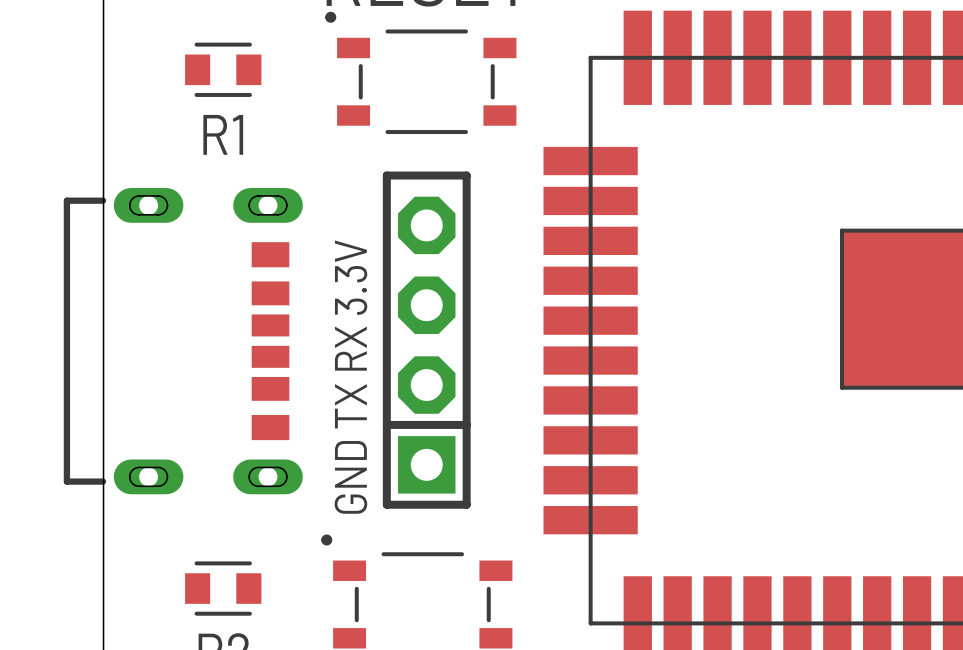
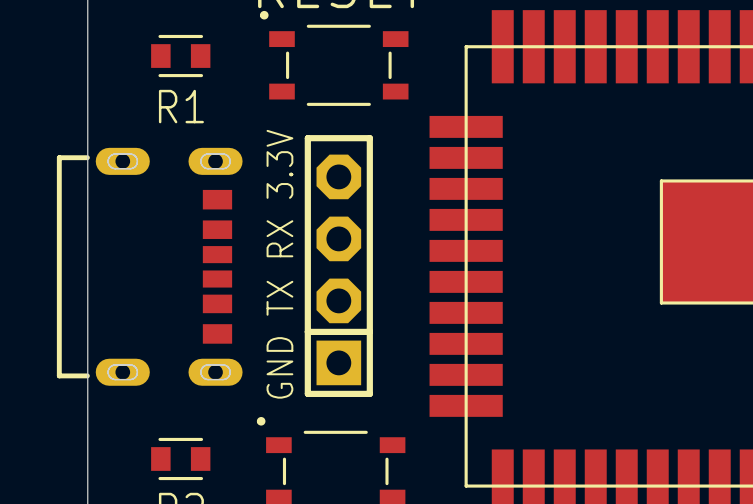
board edge: none -> (114, 154) (109, 156) (108, 160) (112, 168) (131, 168) (136, 164) (136, 158) (133, 154) (114, 154)
board edge: none -> (206, 154) (202, 156) (200, 160) (205, 168) (224, 168) (229, 164) (229, 158) (225, 154) (206, 154)
board edge: none -> (114, 365) (109, 367) (108, 371) (112, 378) (131, 379) (136, 375) (136, 369) (133, 365) (114, 365)
board edge: none -> (206, 365) (202, 367) (200, 371) (205, 378) (224, 379) (229, 375) (229, 369) (225, 365) (206, 365)

